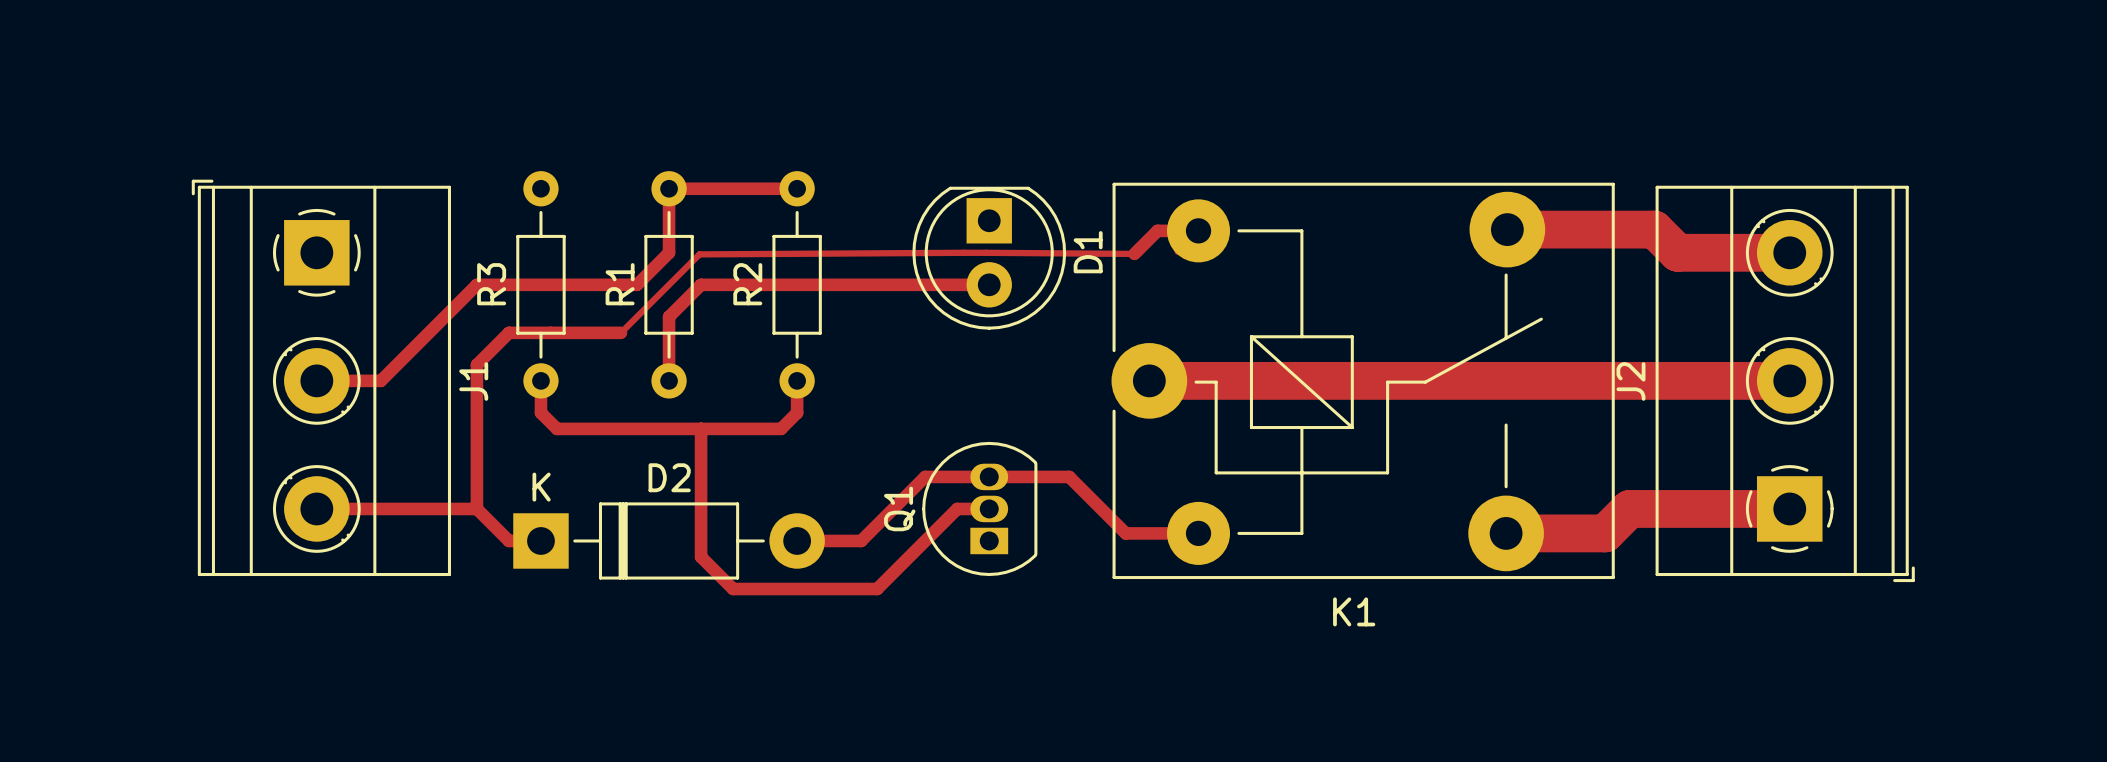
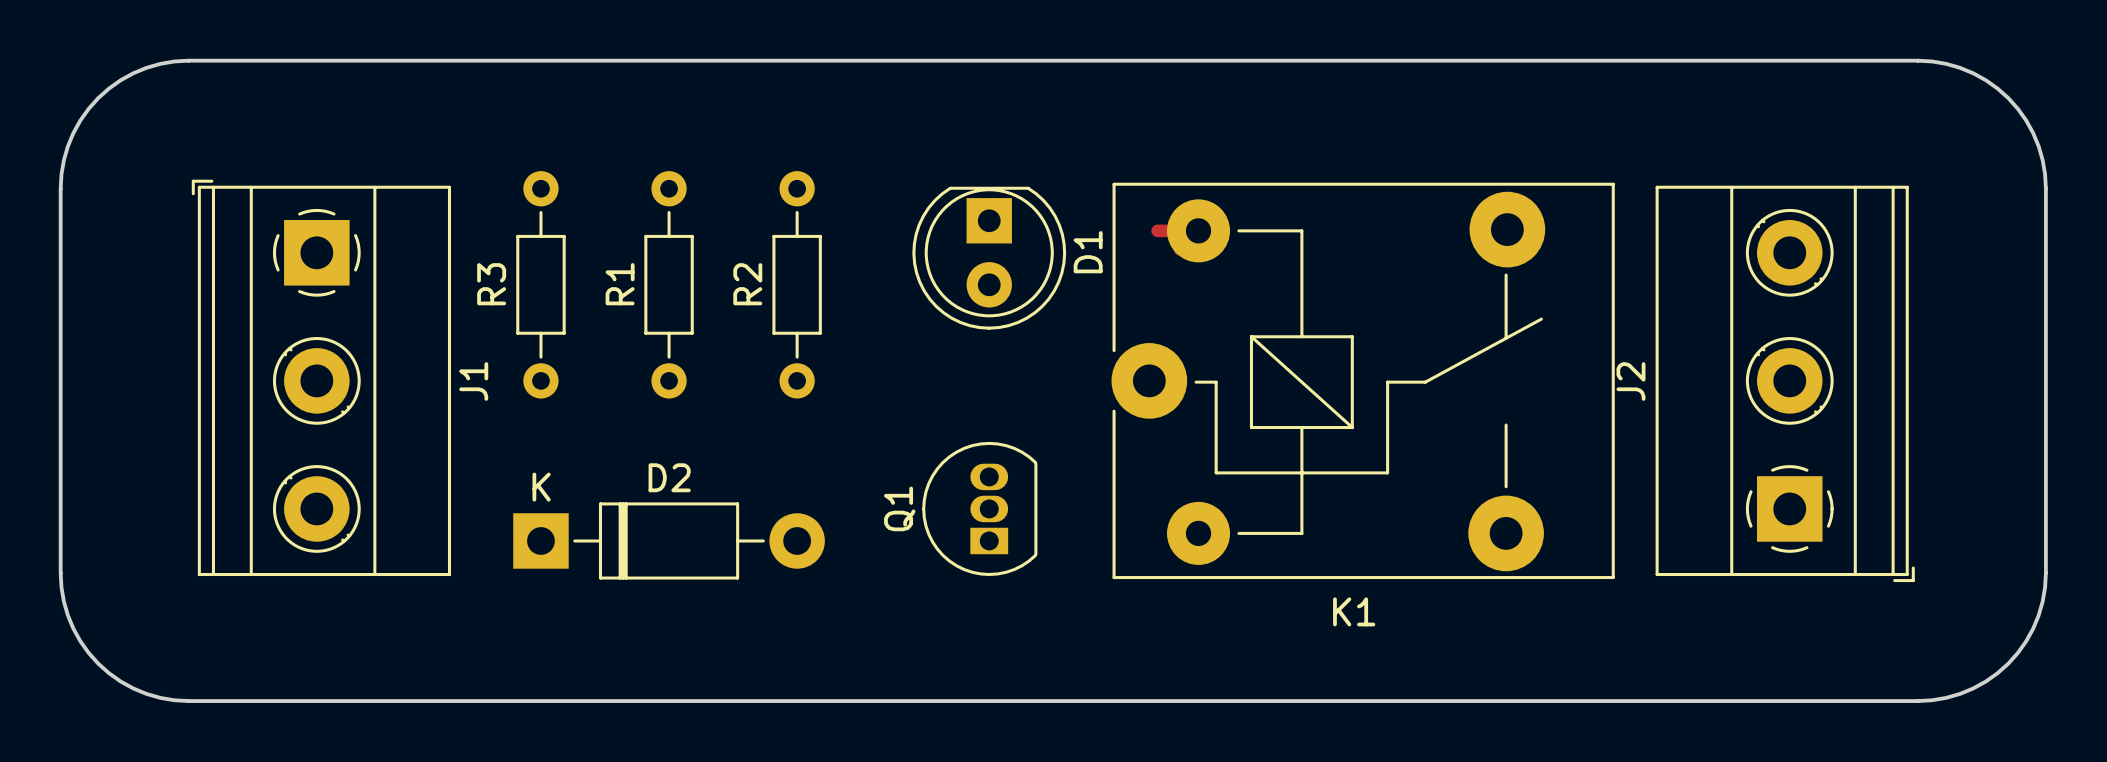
board edge: none -> (188, 60) (1917, 60) (1932, 61) (1960, 67) (1985, 80) (1997, 88) (2017, 108) (2033, 133) (2042, 160) (2045, 174) (2045, 572) (2045, 587) (2038, 615) (2026, 641) (2017, 652) (1997, 673) (1973, 688) (1960, 693) (1946, 697) (1917, 701) (188, 701) (160, 697) (146, 693) (133, 688) (108, 673) (88, 652) (80, 641) (67, 615) (61, 587) (61, 174) (63, 160) (73, 133) (80, 120) (98, 98) (120, 80) (133, 73) (160, 63) (188, 60)
track: (797, 188) (669, 188) (669, 252) (637, 284) (476, 284) (380, 380) (316, 380) -> none
track: (1507, 229) (1654, 229) (1677, 252) (1789, 252) -> none
track: (1157, 230) (1134, 253) (699, 254) (621, 332) (508, 332) (476, 364) (476, 508) -> none
track: (989, 284) (701, 284) (669, 316) (669, 380) -> none
track: (540, 380) (540, 412) (556, 428) (781, 428) (797, 412) (797, 380) -> none
track: (1149, 380) (1789, 380) -> none
track: (701, 428) (701, 556) (733, 589) (877, 589) (957, 508) (989, 508) -> none
track: (316, 508) (476, 508) -> none
track: (476, 508) (508, 540) (540, 540) -> none
track: (1789, 508) (1629, 508) (1605, 533) (1506, 533) -> none
track: (1198, 533) (1125, 533) (1069, 476) (925, 476) (861, 540) (797, 540) -> none

